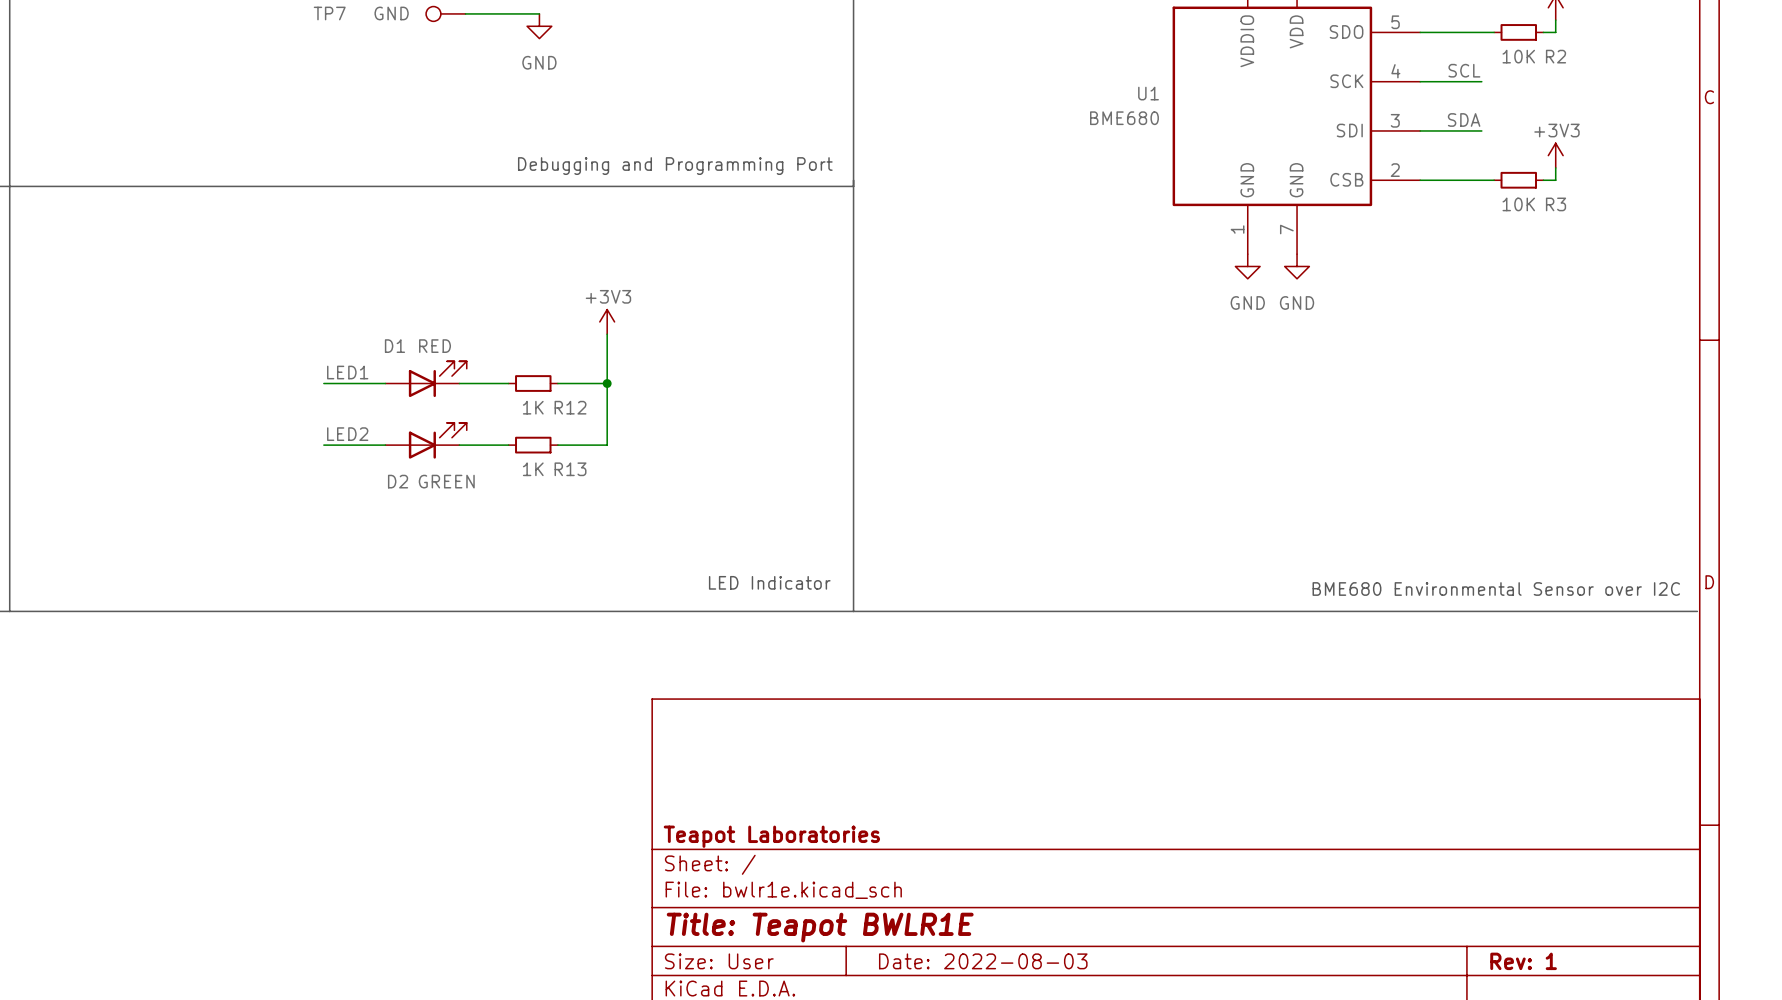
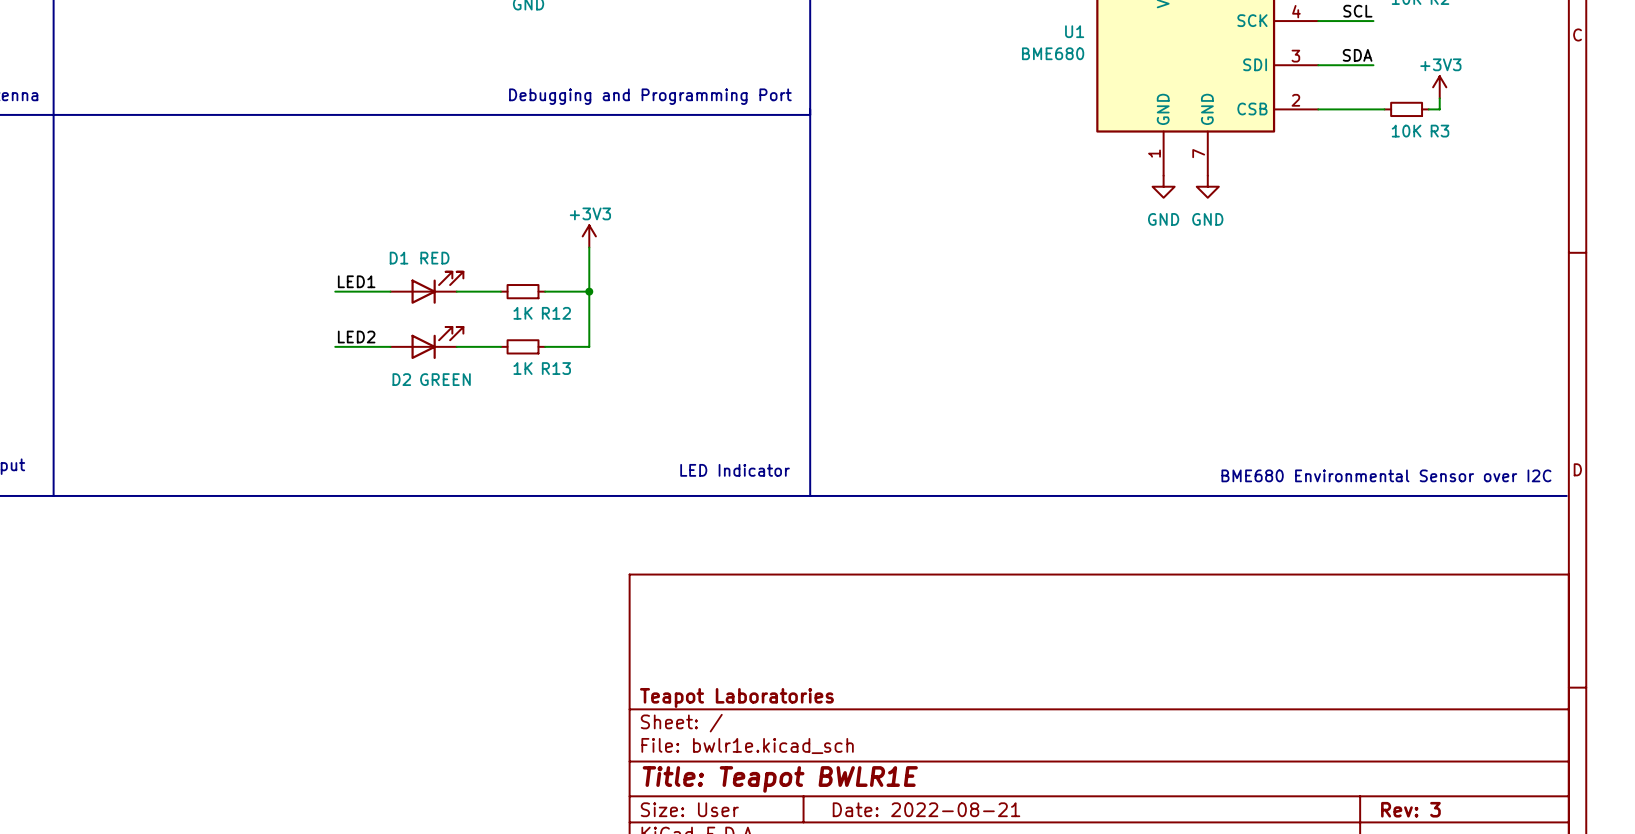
title block: Date: 2022-08-03 (983, 961) -> Date: 2022-08-21 (926, 809)
title block: Rev: 1 (1523, 961) -> Rev: 3 (1410, 809)

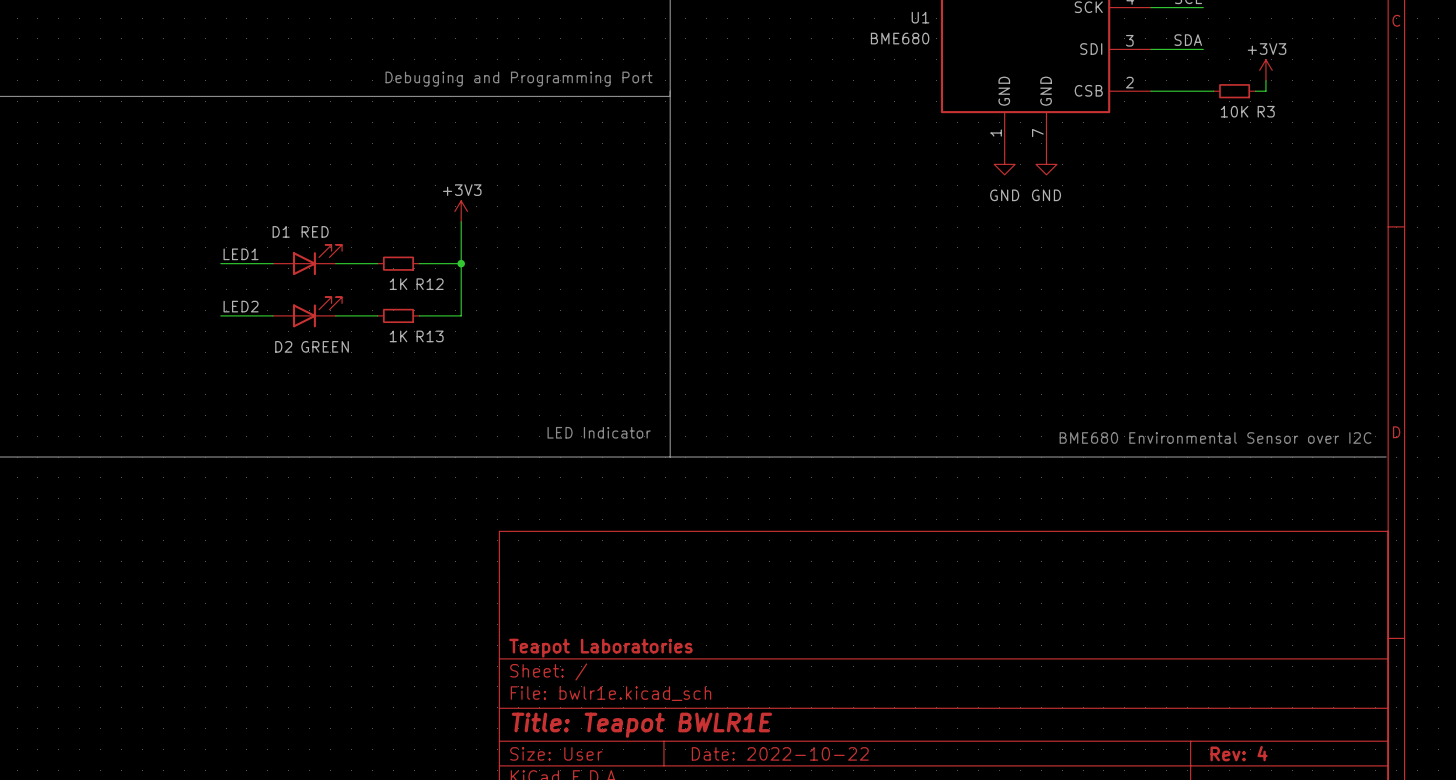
title block: Date: 2022-08-21 (926, 809) -> Date: 2022-10-22 (780, 753)
title block: Rev: 3 (1410, 809) -> Rev: 4 (1238, 753)

